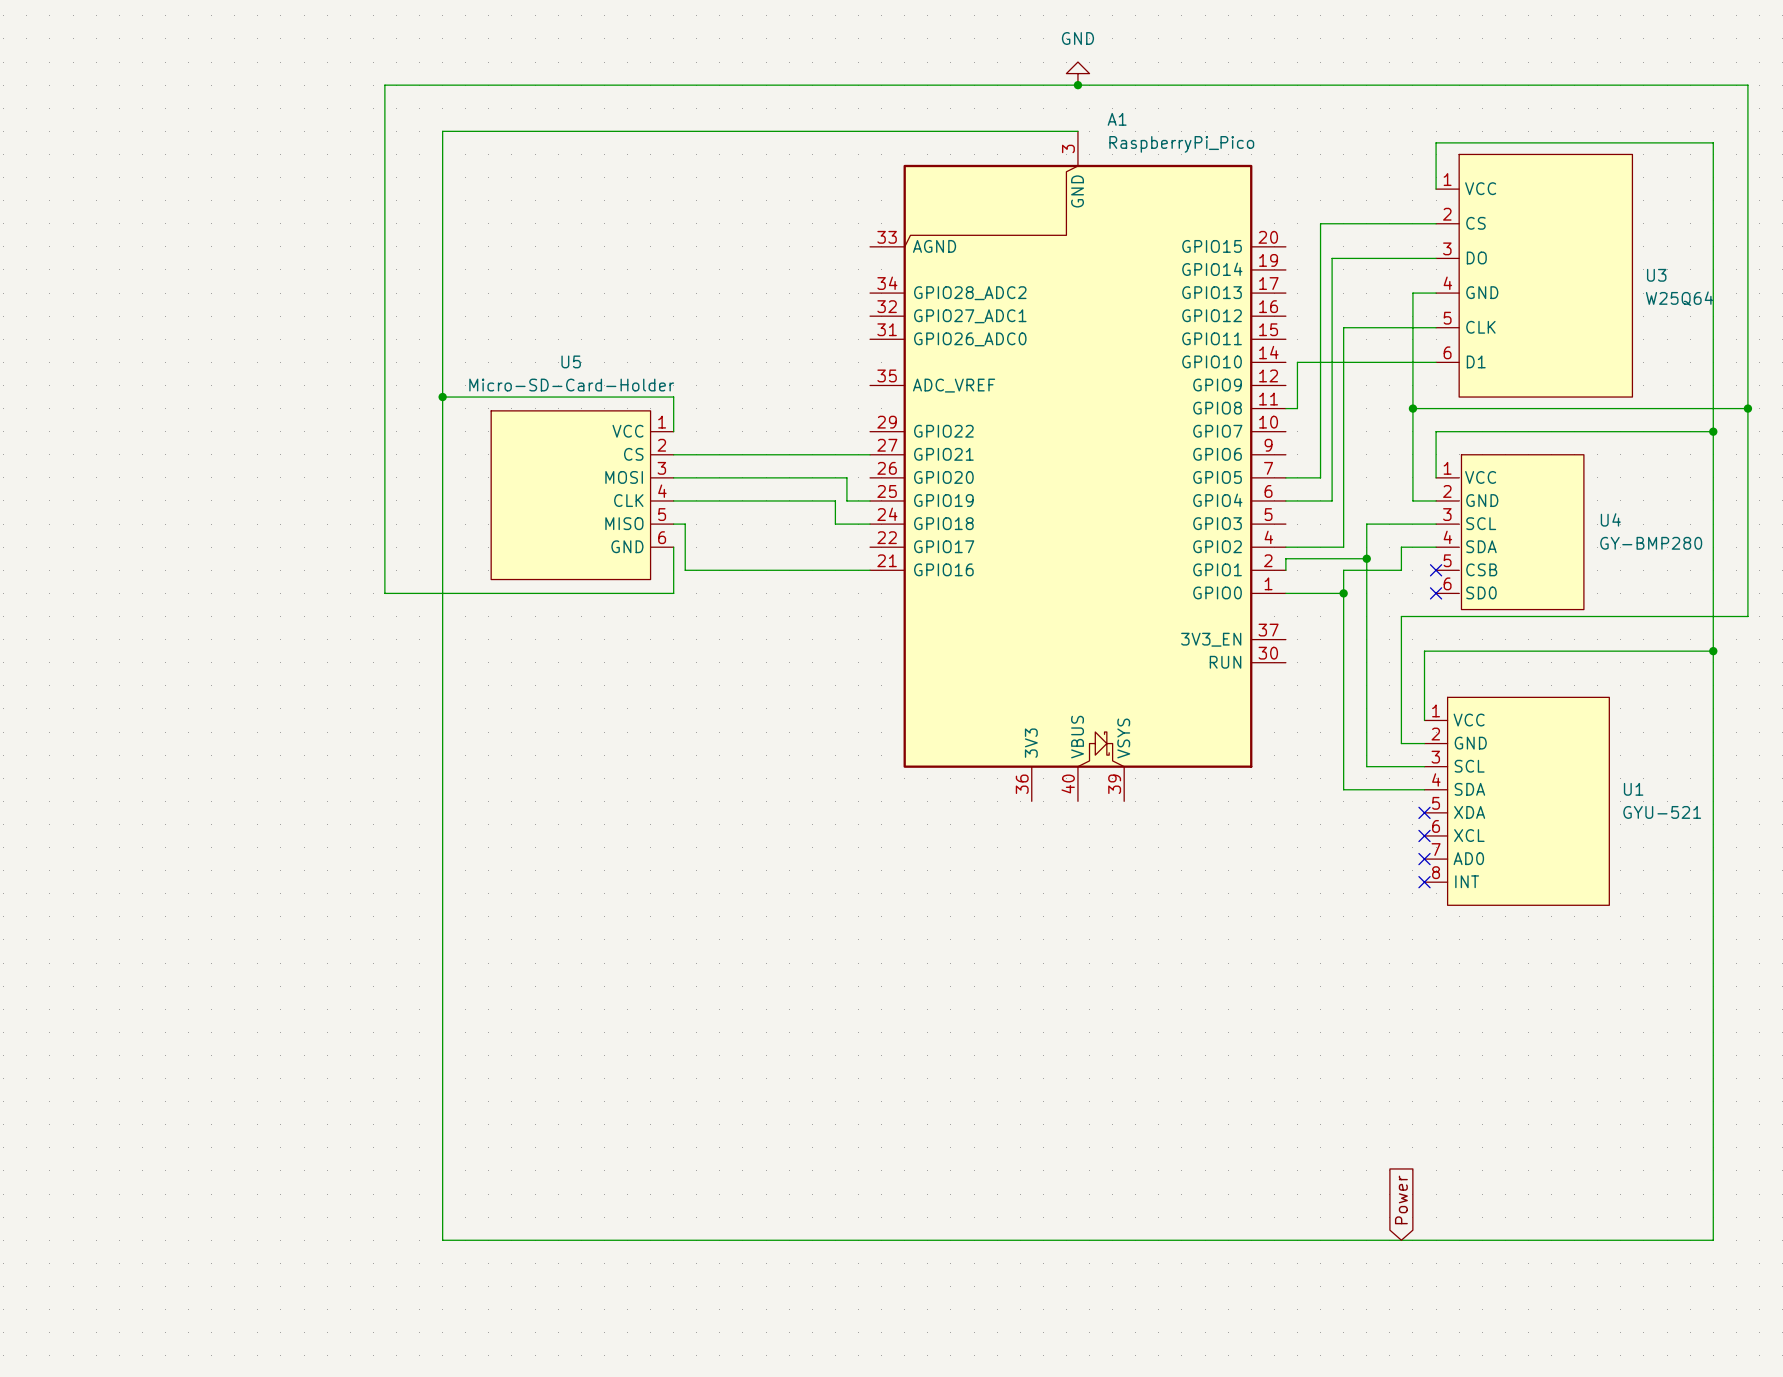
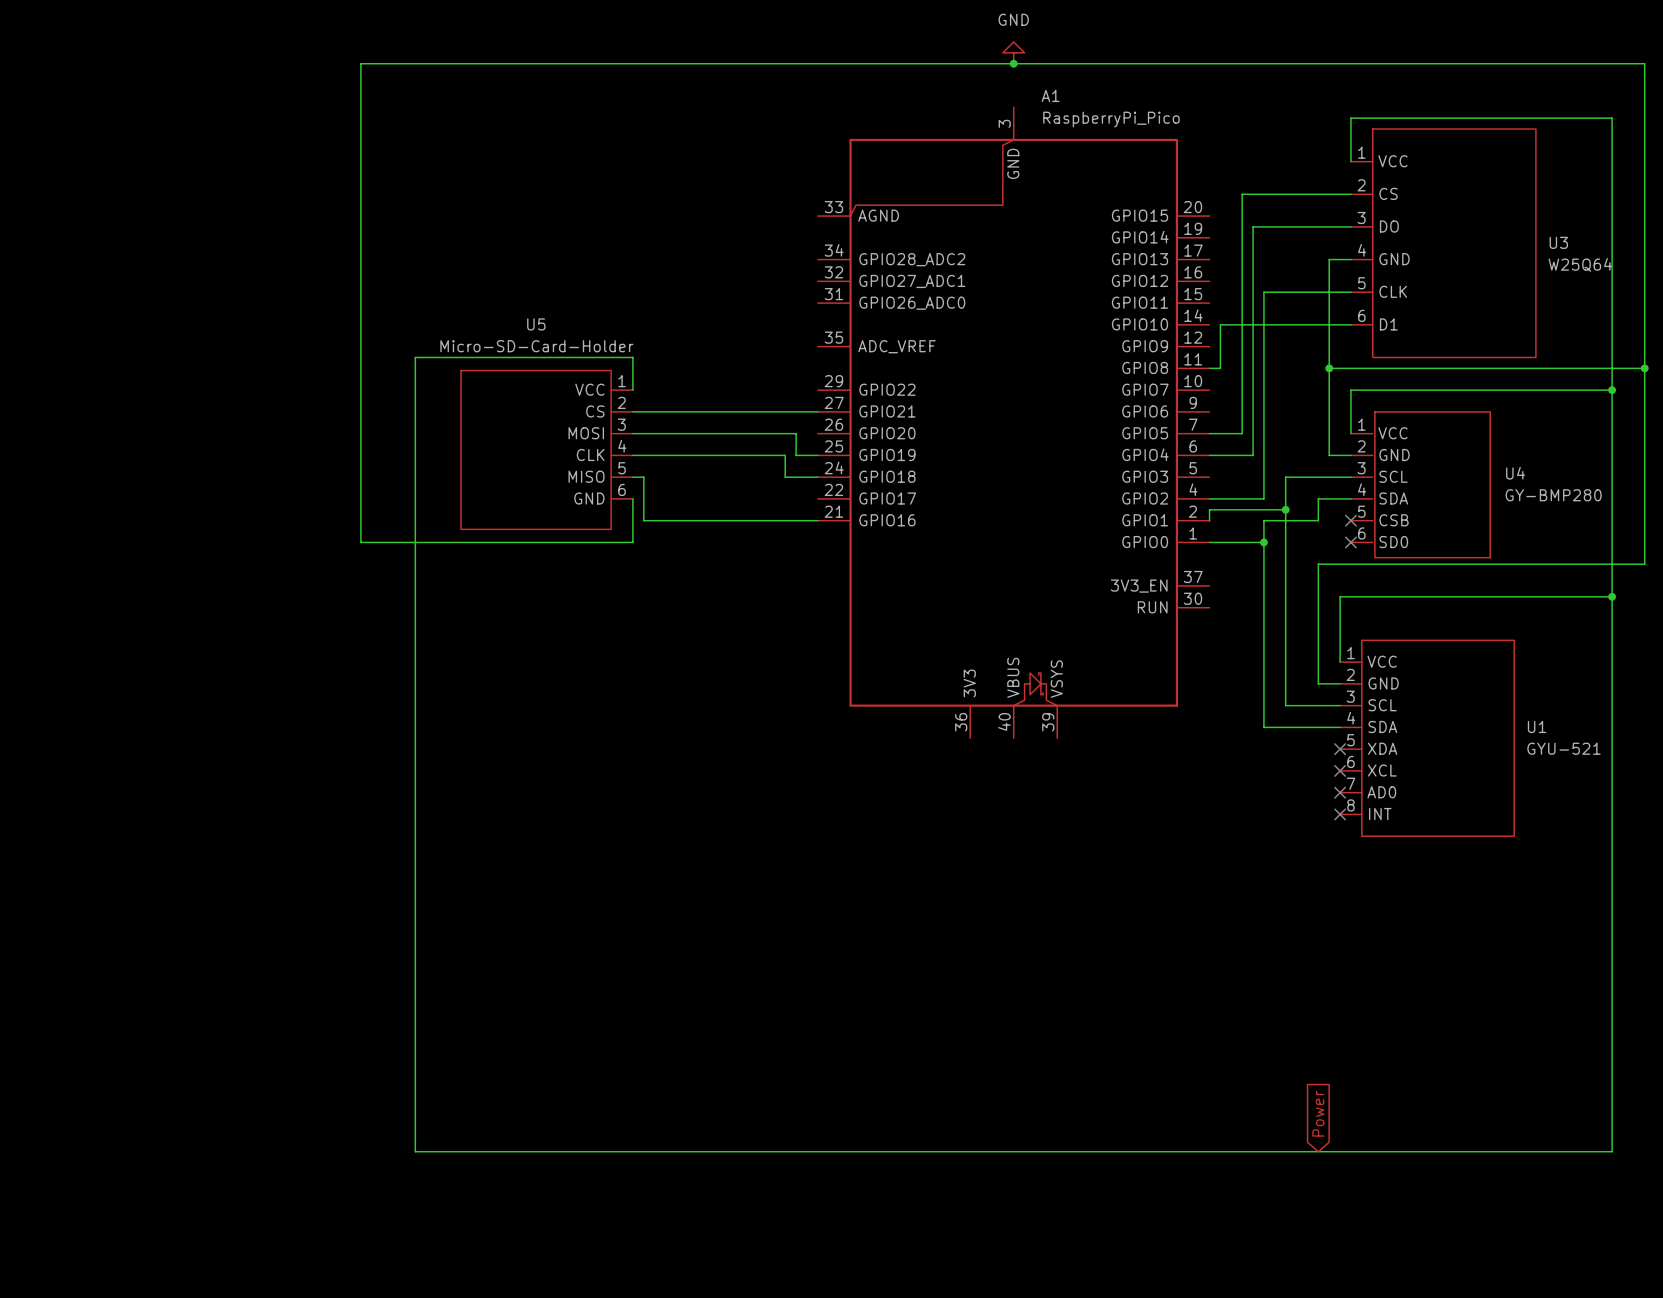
wire: (1077, 131) (442, 131) (442, 397) -> none
junction: (442, 397) -> none

